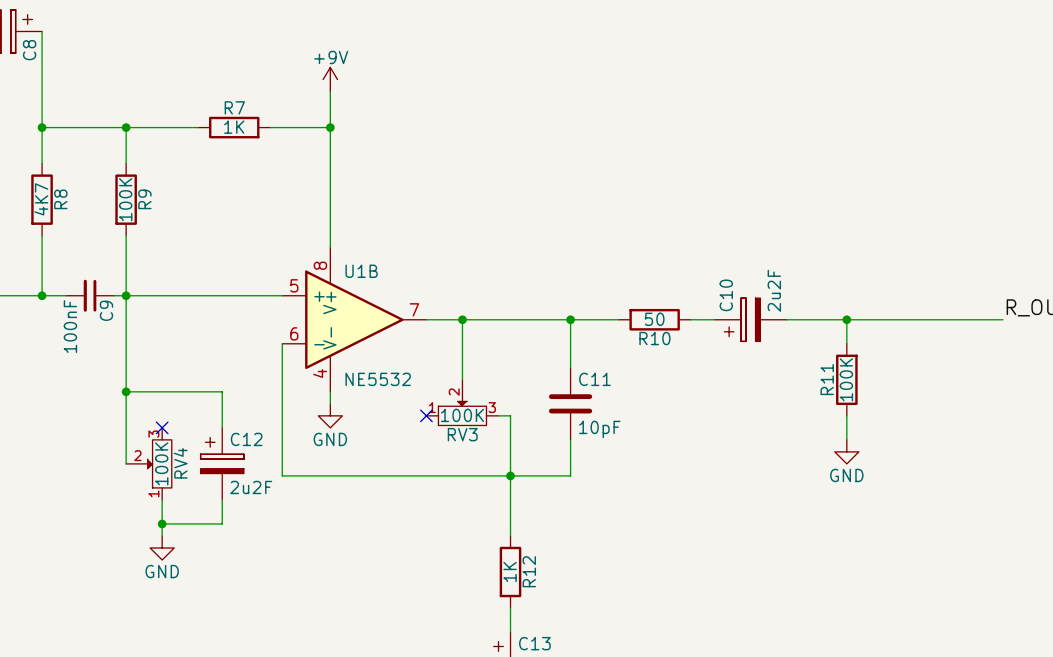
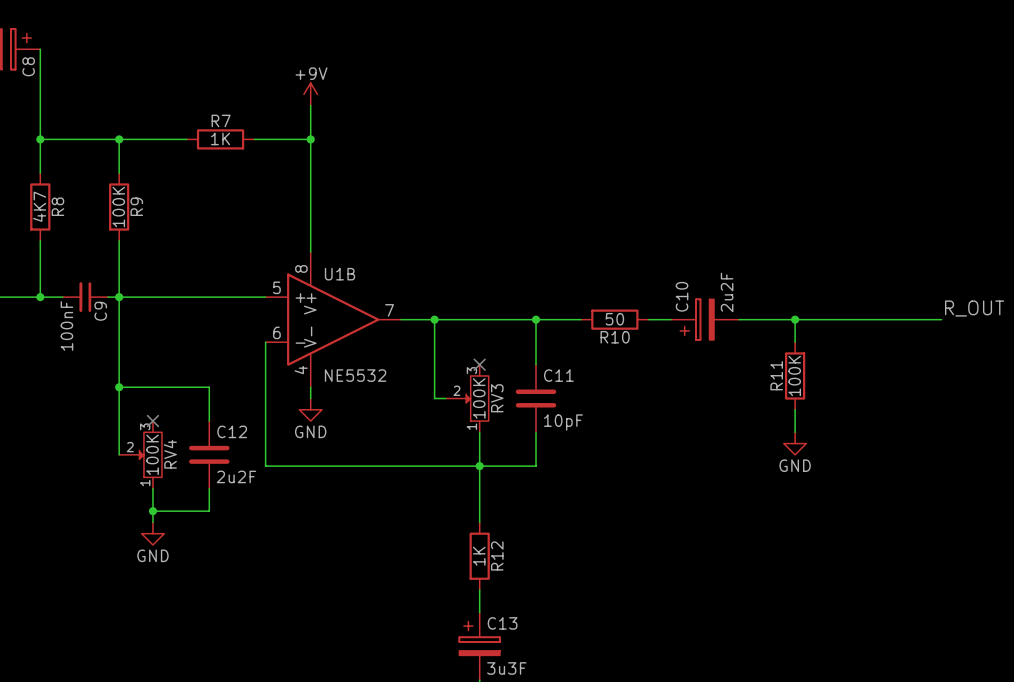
no-connect mark: none -> (479, 364)
RV3 rotation: 0° (462, 413) -> 90° counterclockwise (477, 398)
no-connect mark: (426, 415) -> none
wire: (498, 415) (510, 415) (510, 439) -> none
C12 symbol: [200, 427, 244, 500] -> [189, 421, 230, 489]

